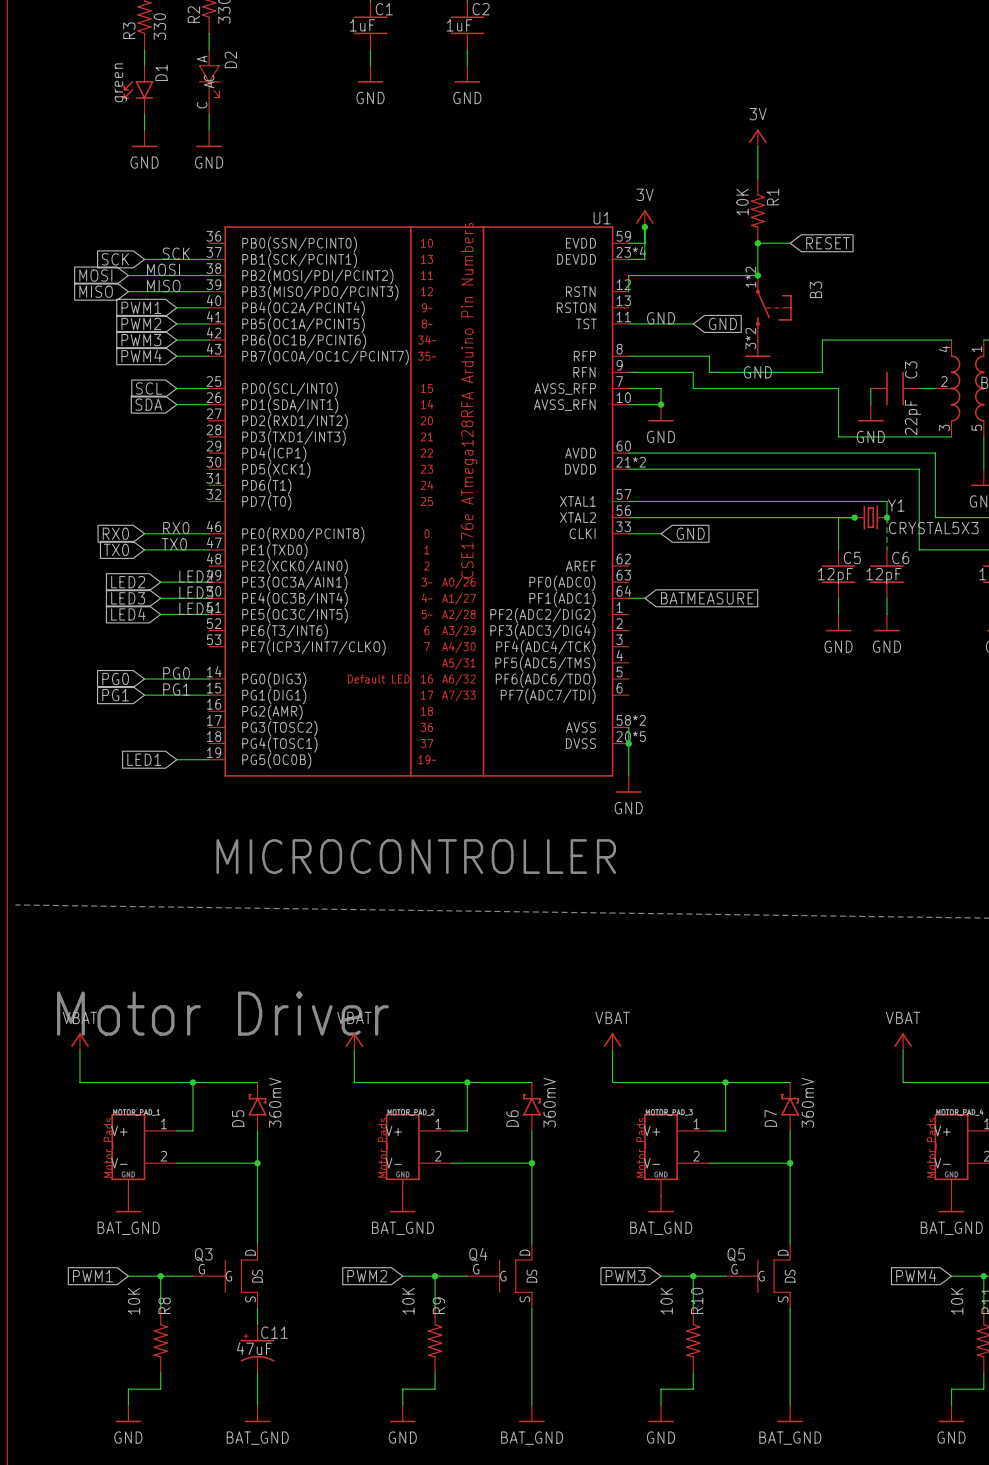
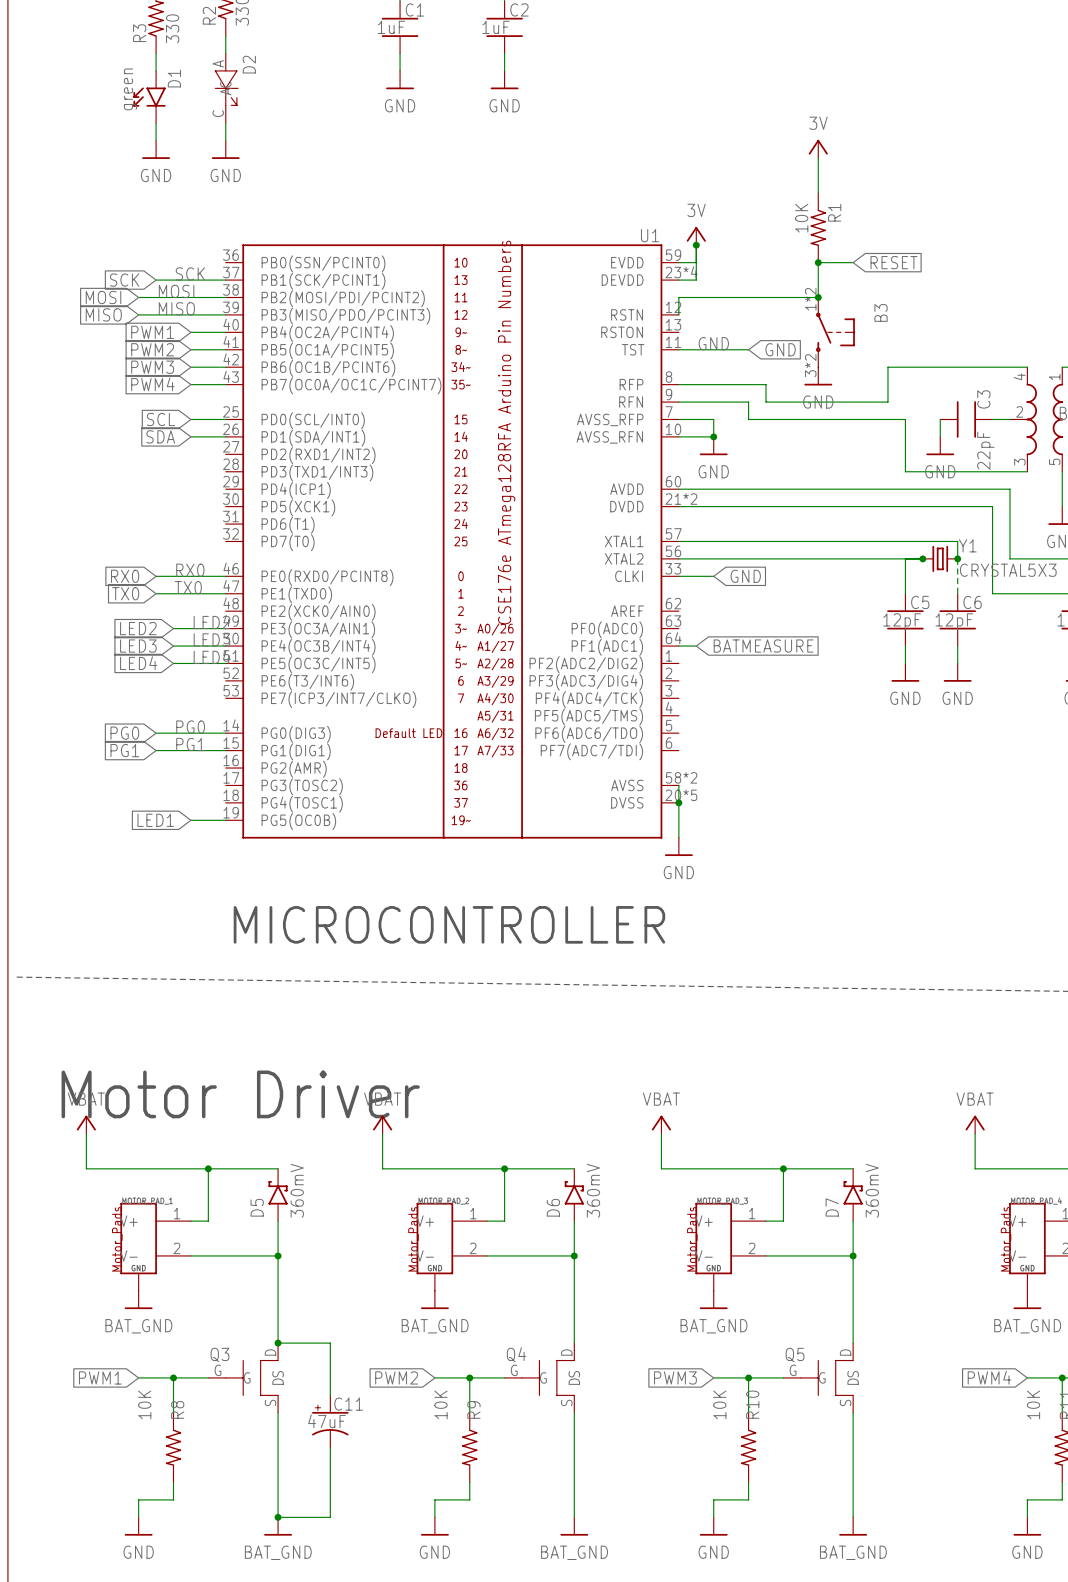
wire: none -> (278, 1343) (330, 1343) (330, 1395)
junction: none -> (278, 1343)
wire: none -> (330, 1447) (330, 1517) (278, 1517)
C11 position: (257, 1348) -> (330, 1421)
junction: none -> (278, 1517)

